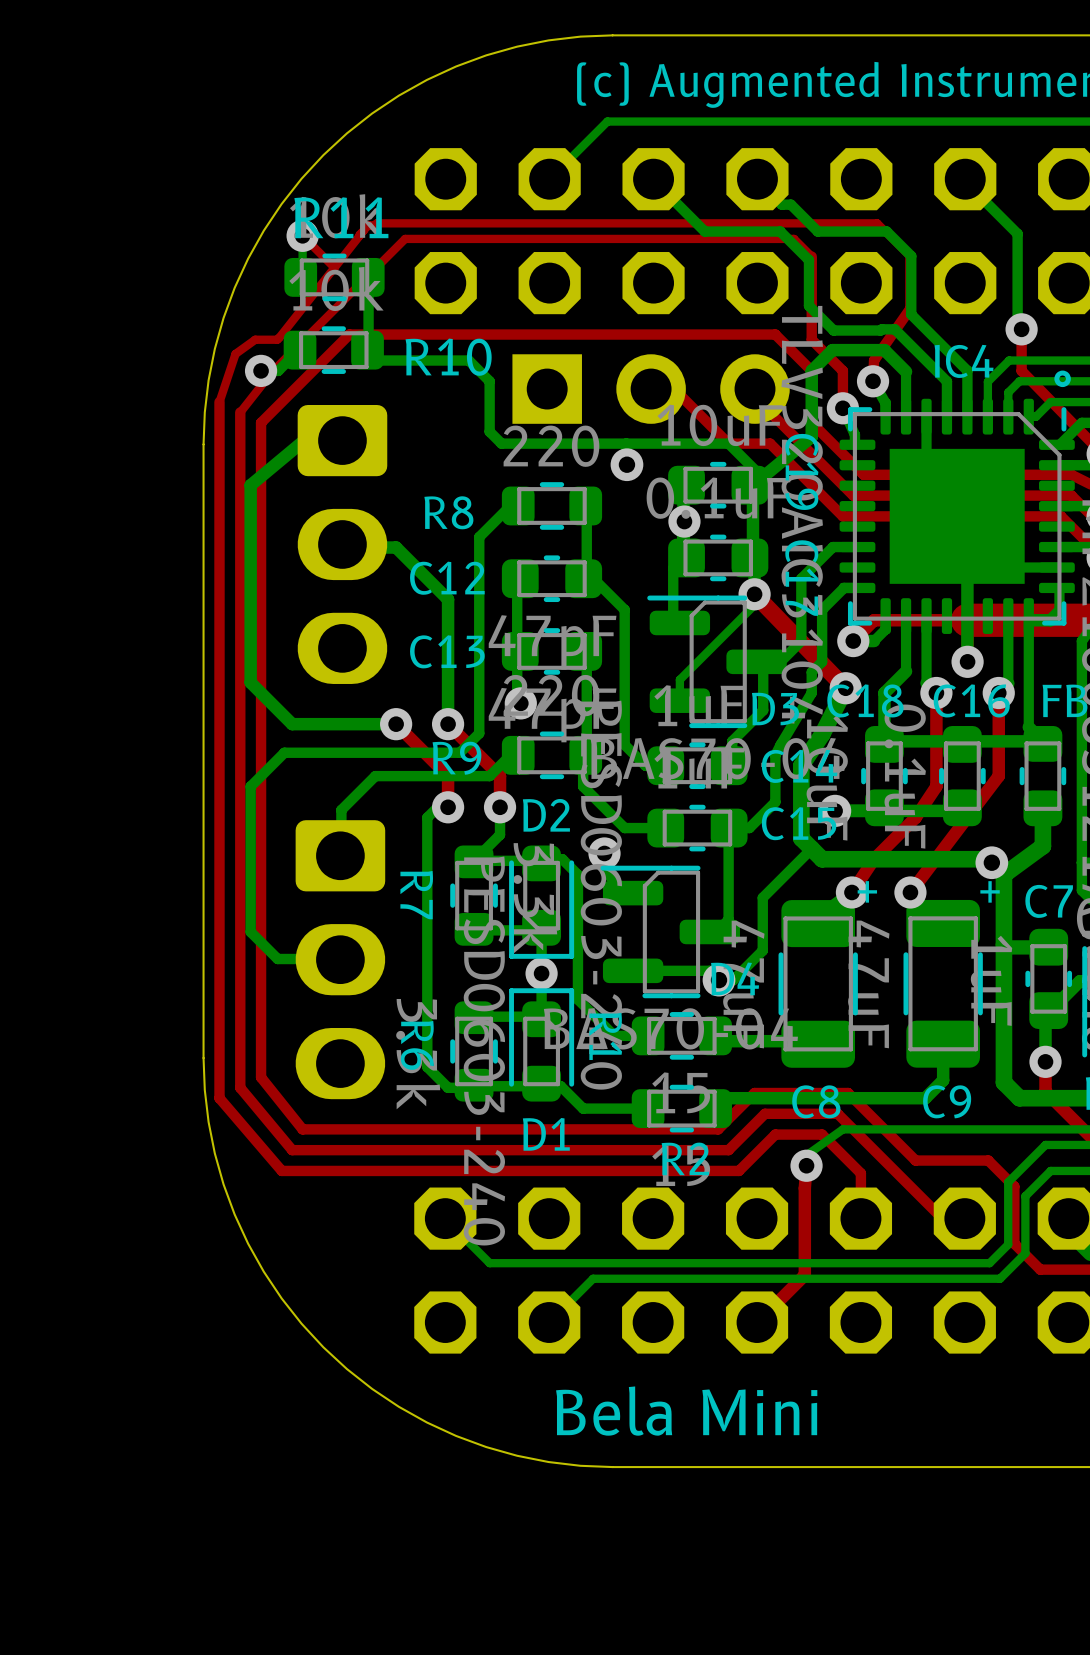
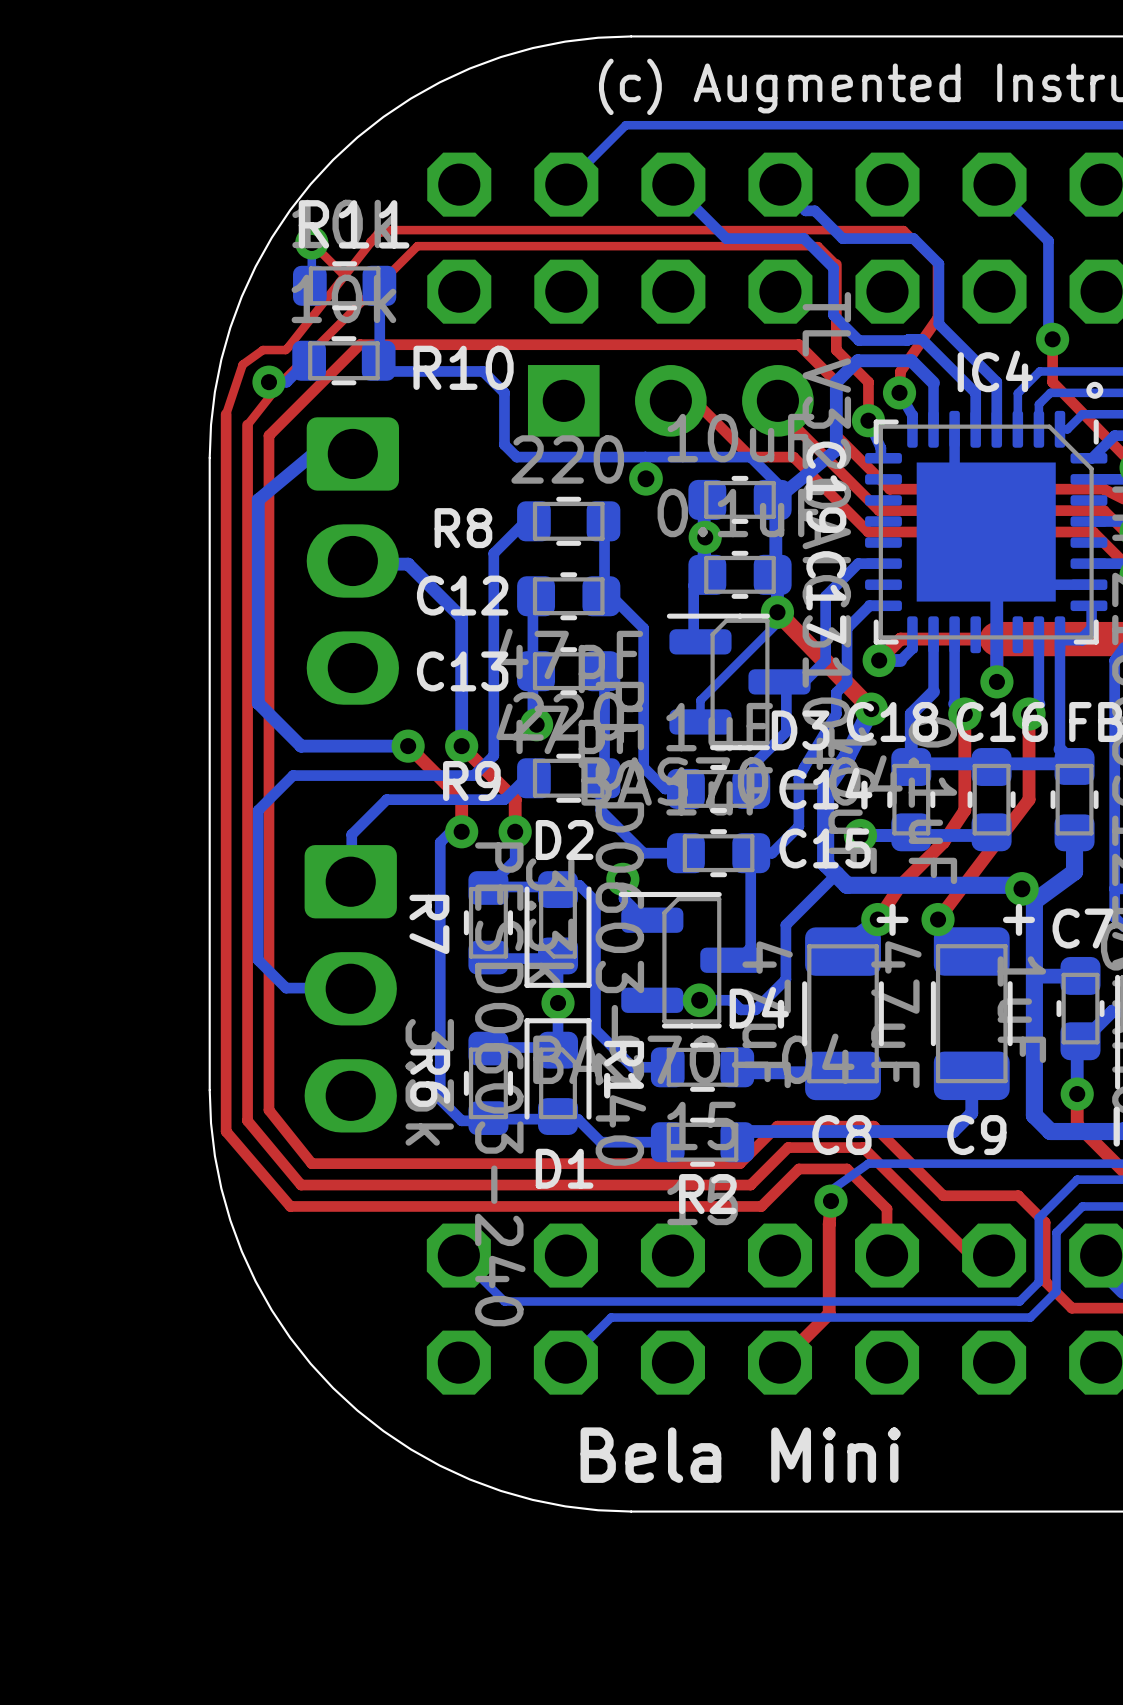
via position: (719, 980) -> (699, 1000)

